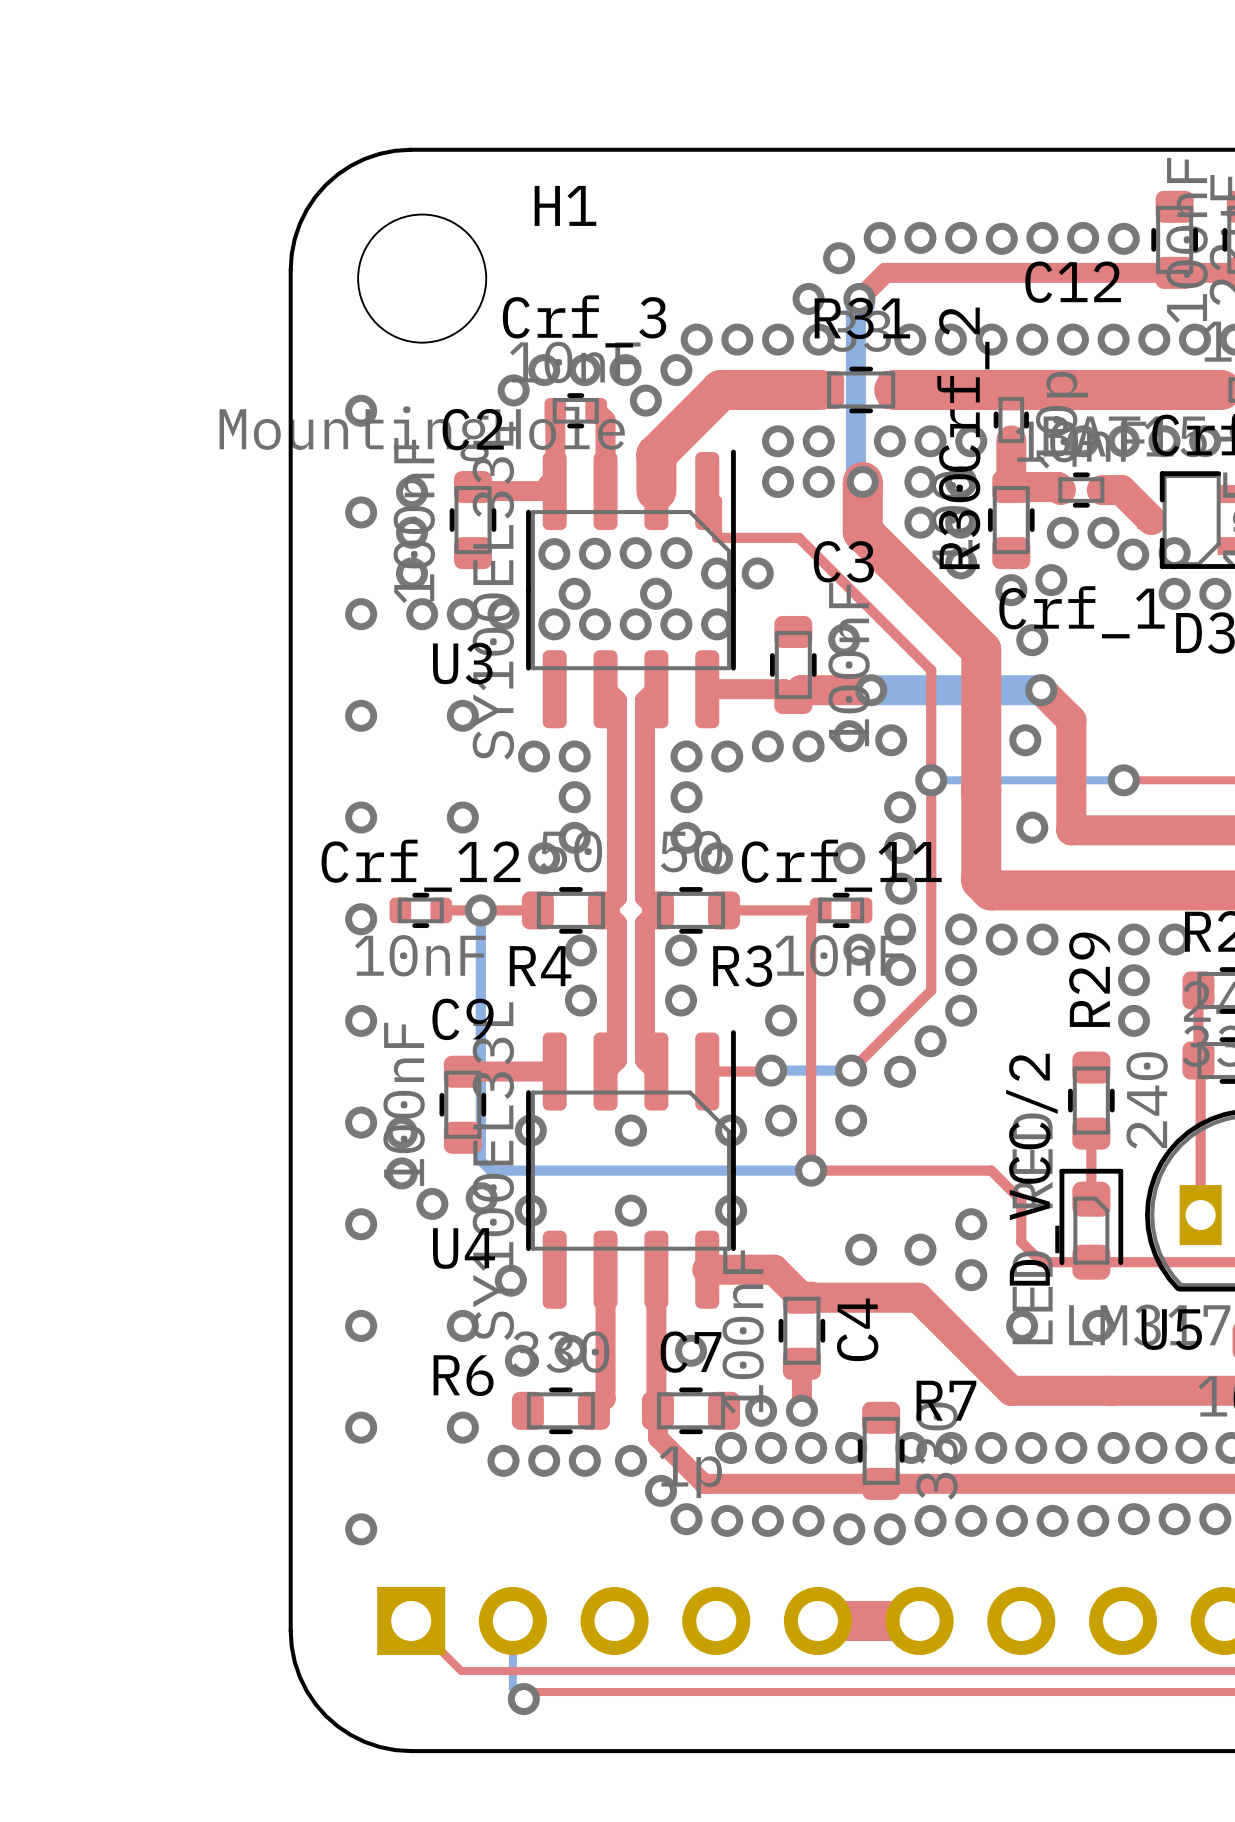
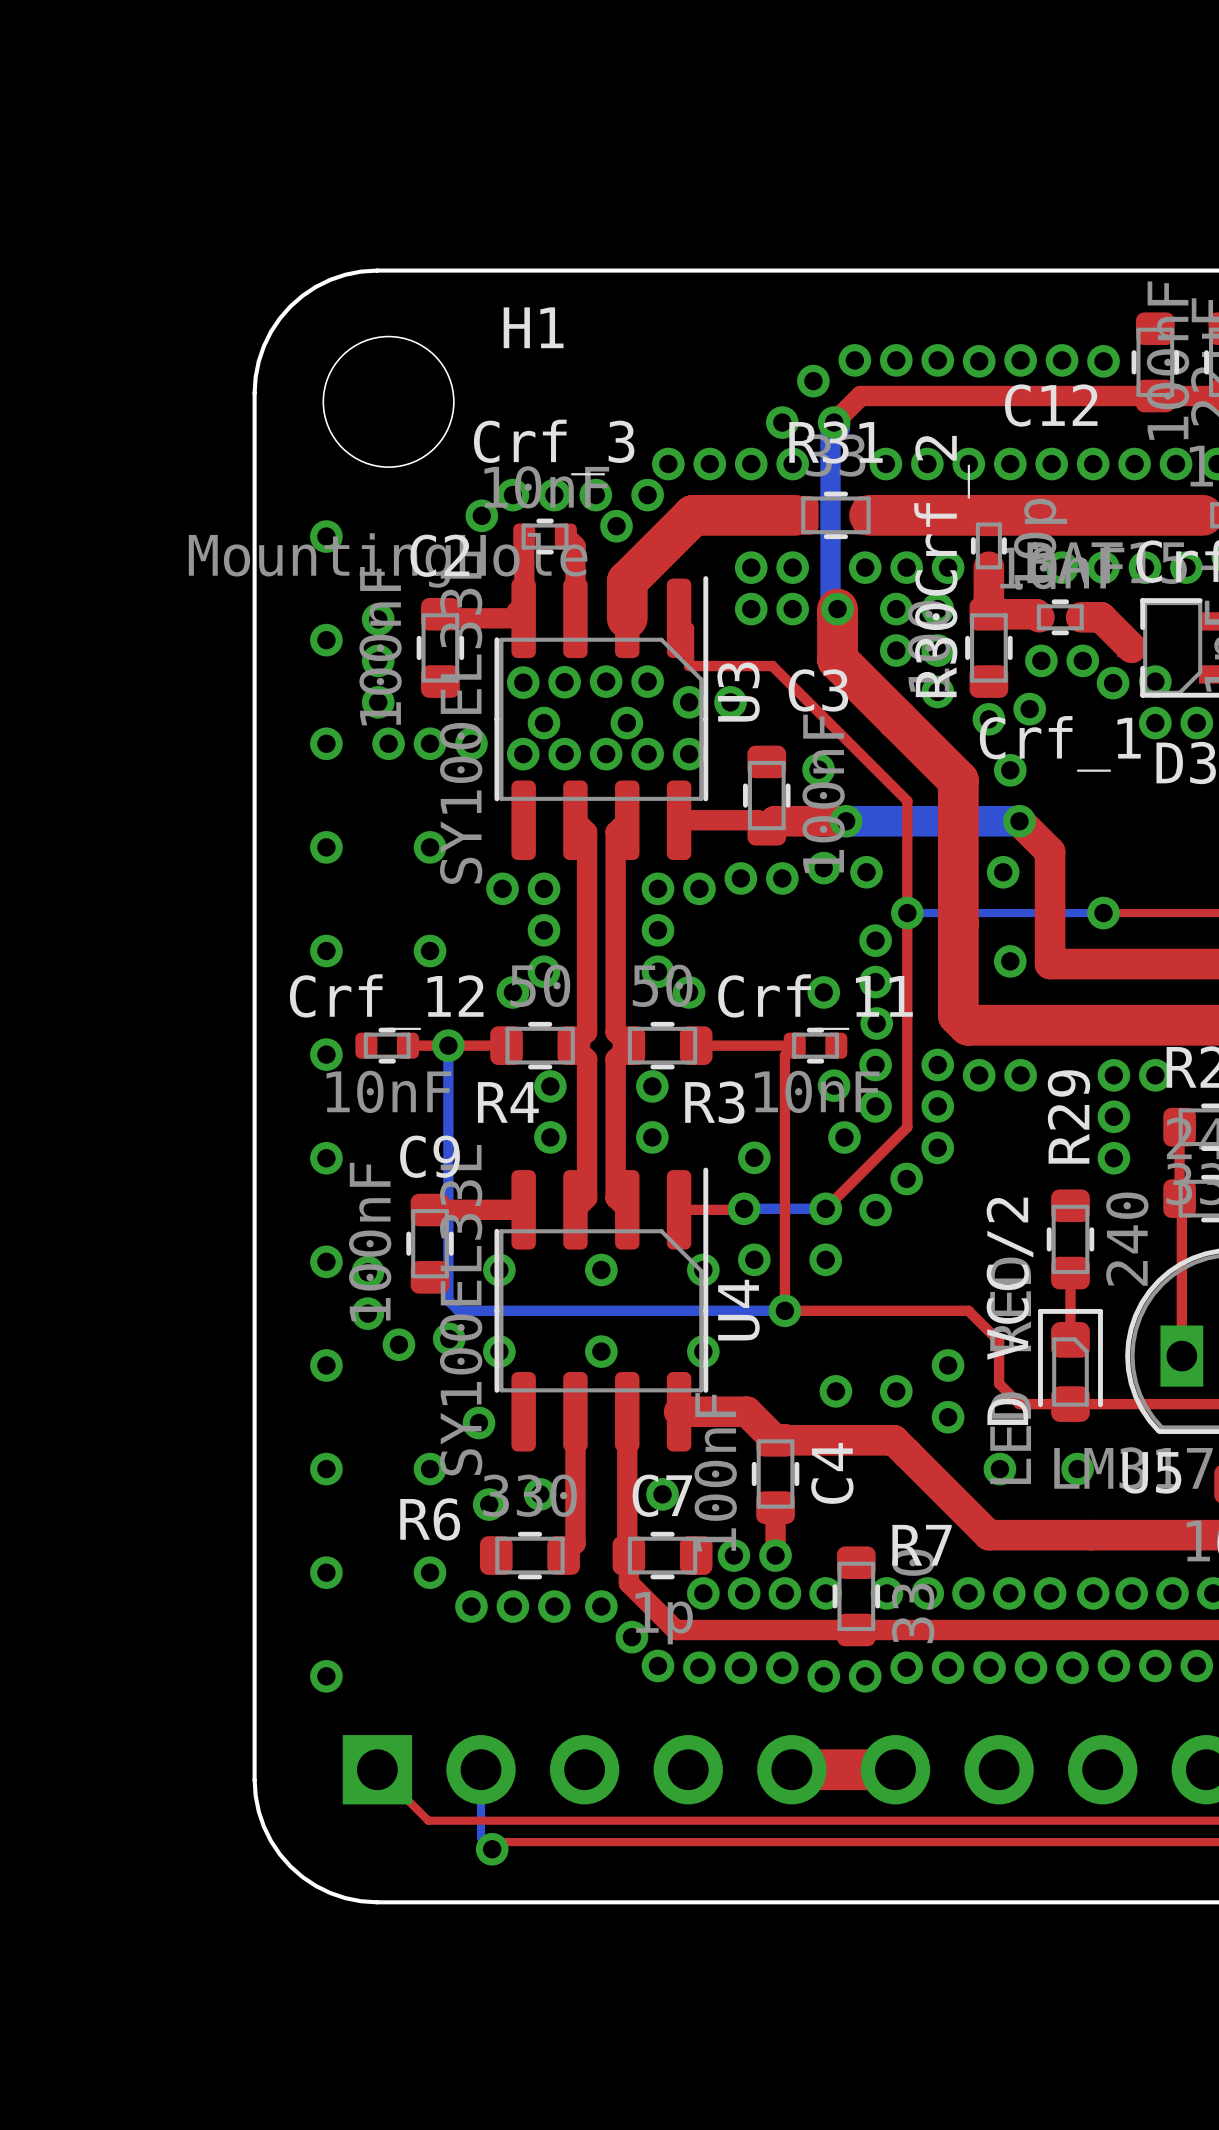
U3 name rotation: 0° (462, 663) -> 90° counterclockwise (738, 692)
U3 name position: U3 (462, 663) -> U3 (738, 692)
U4 name rotation: 0° (464, 1248) -> 90° counterclockwise (738, 1310)
U4 name position: U4 (464, 1248) -> U4 (738, 1310)

